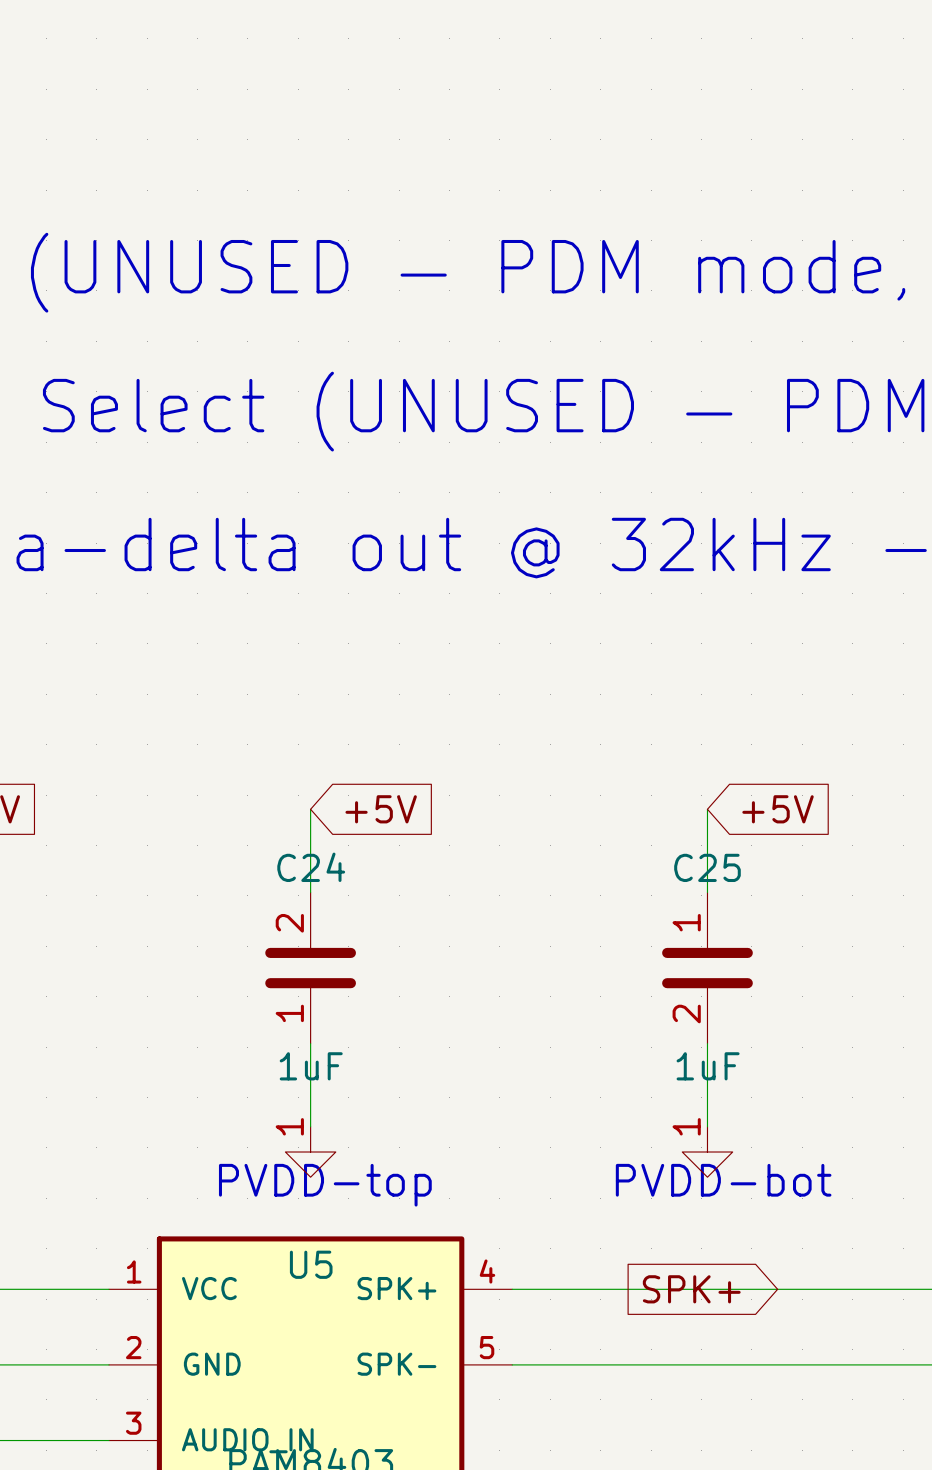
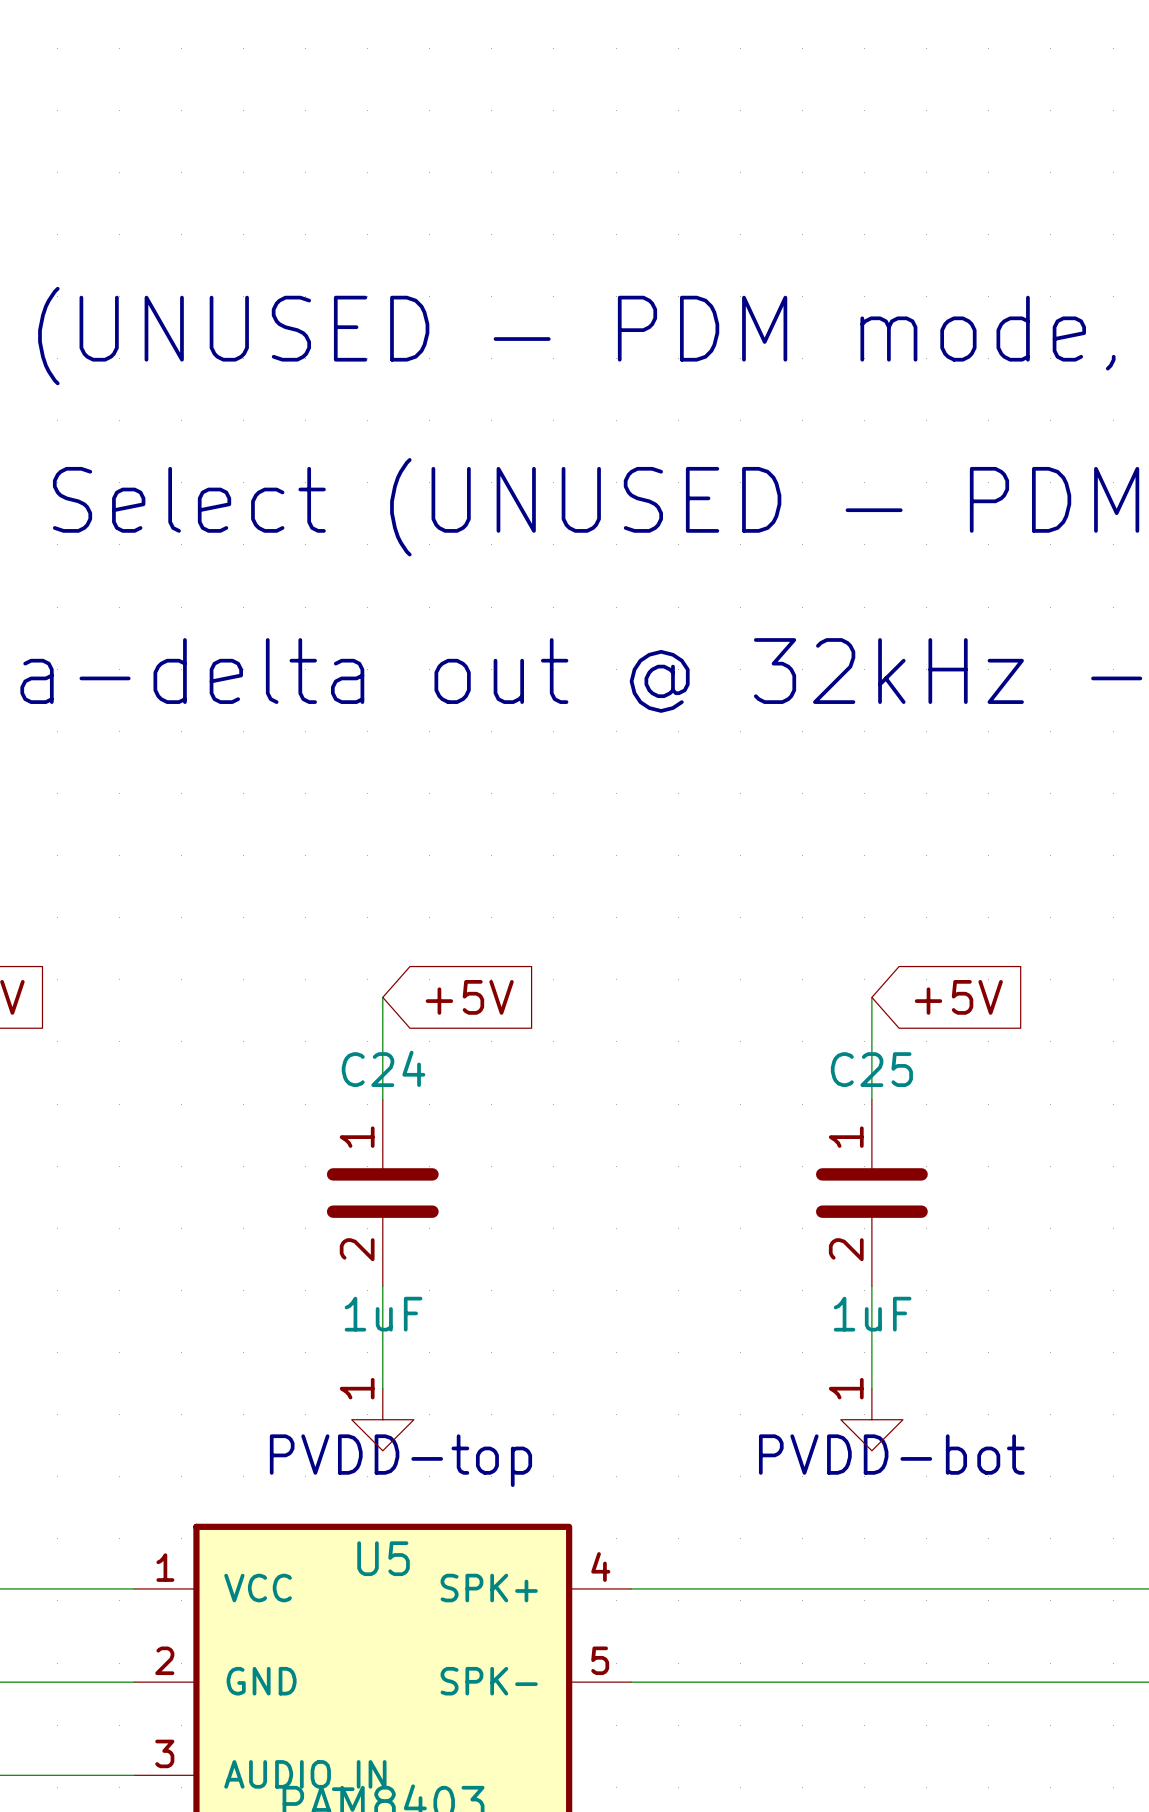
C24 rotation: 0° (310, 968) -> 180° (382, 1193)
global label: SPK+ (691, 1289) -> none

